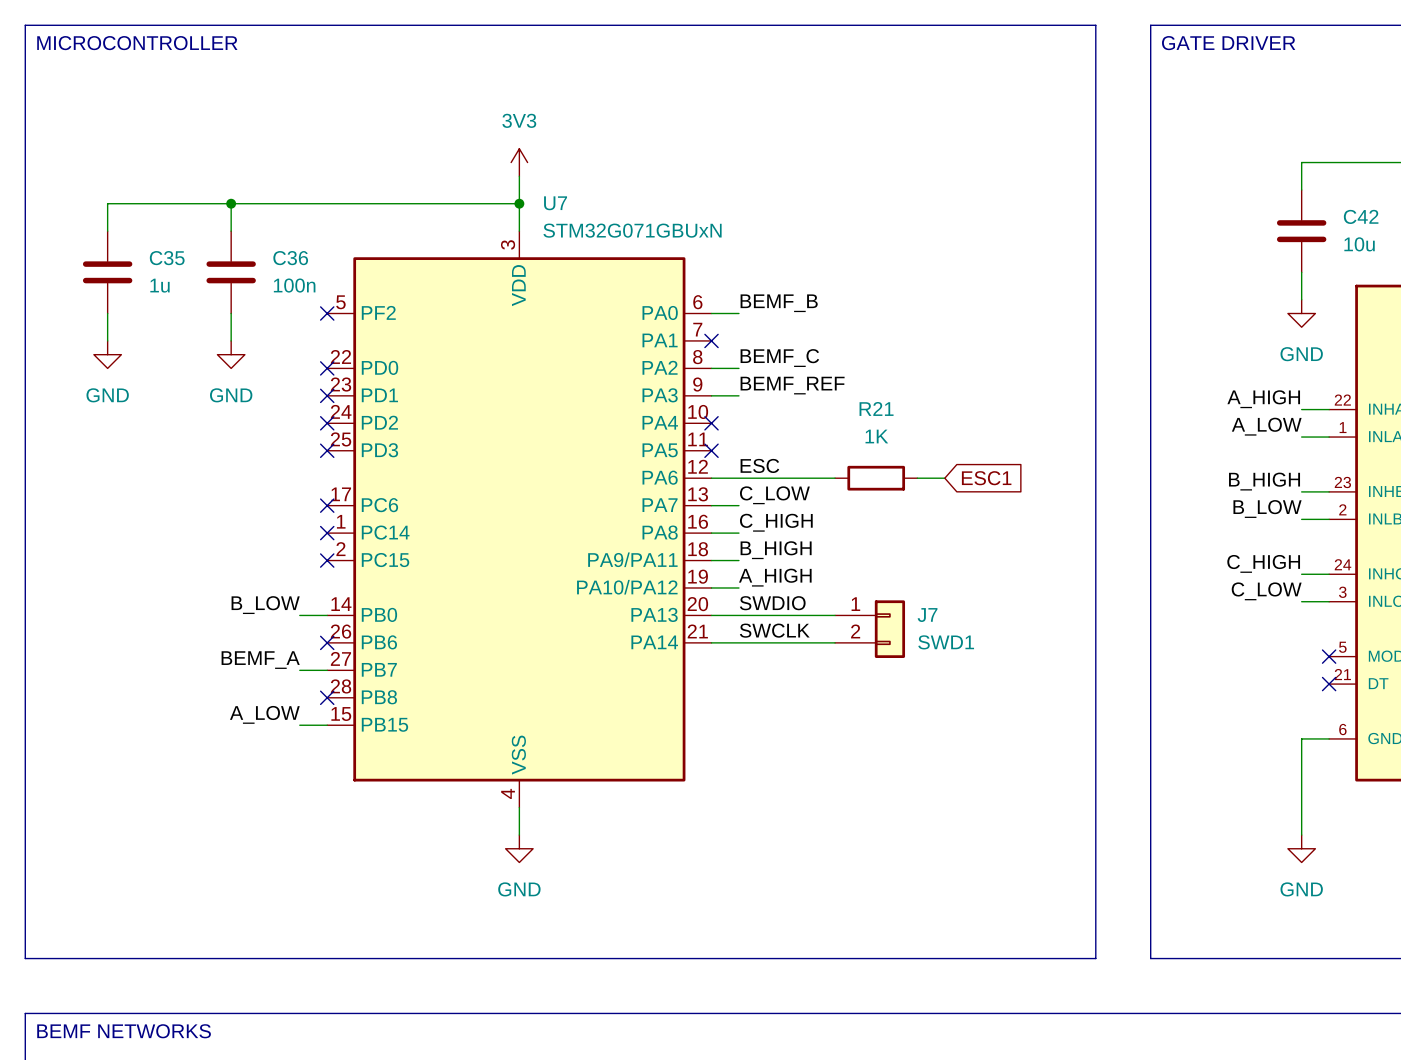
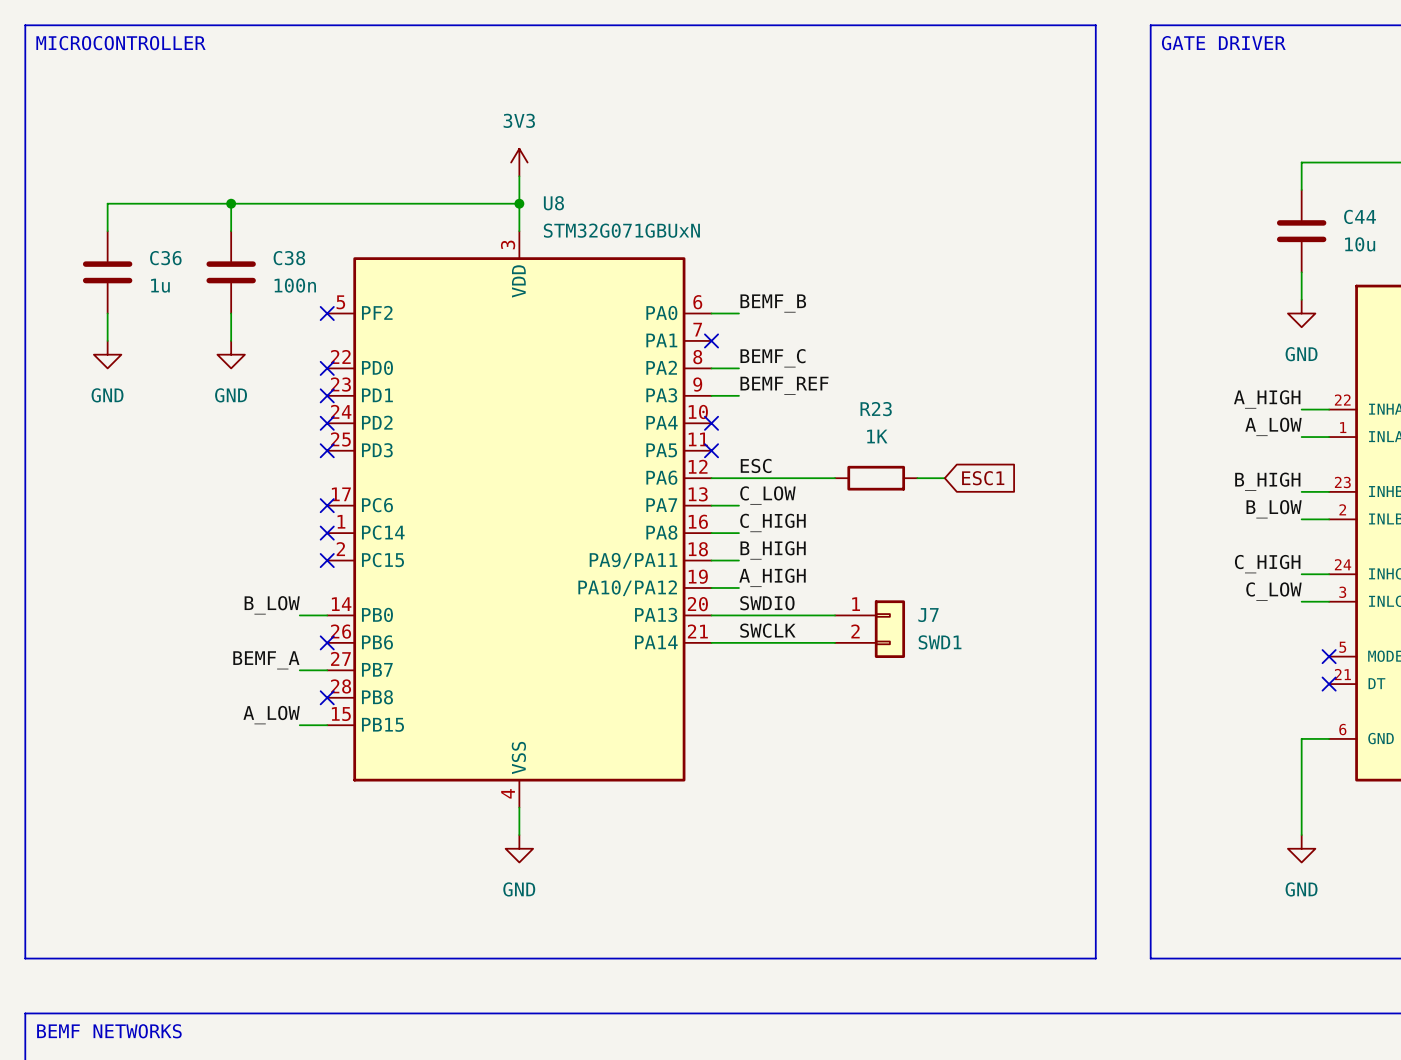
U7 name: U7 (555, 203) -> U8 (553, 203)
C42 name: C42 (1361, 216) -> C44 (1360, 216)
C35 name: C35 (167, 258) -> C36 (165, 258)
C36 name: C36 (290, 258) -> C38 (289, 258)
R21 name: R21 (876, 408) -> R23 (876, 409)

